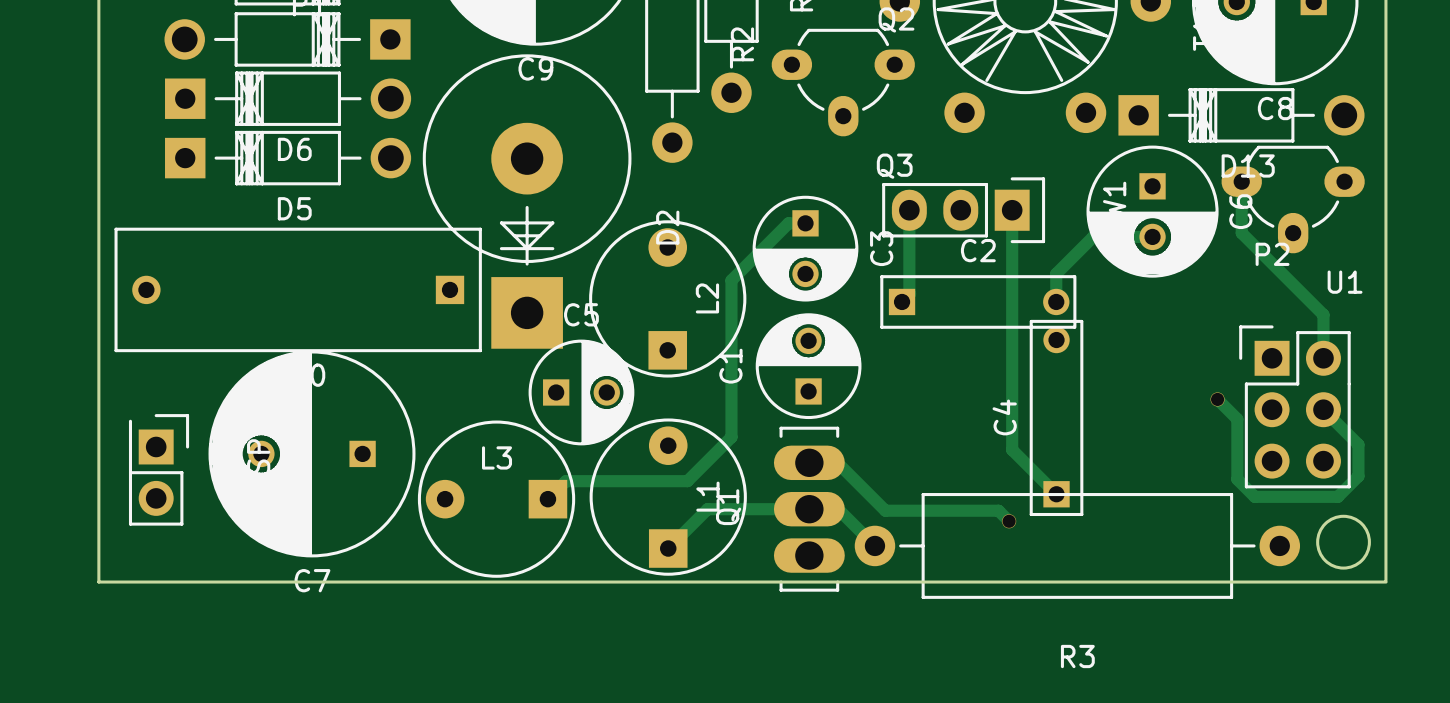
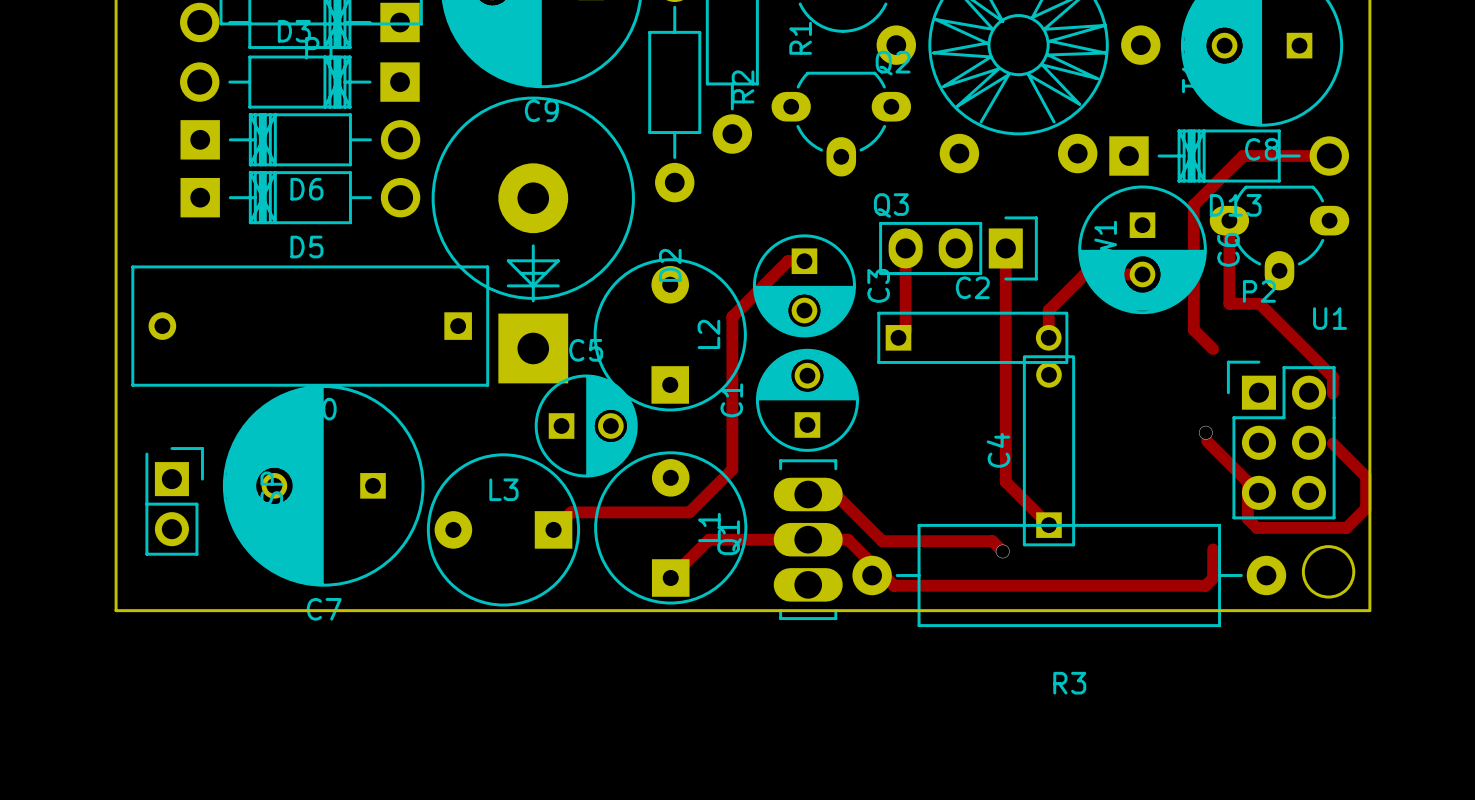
track: none -> (1329, 156) (1242, 156) (1193, 205) (1193, 329) (1213, 349)
track: (1241, 233) (1323, 314) (1323, 358) -> (1229, 270) (1229, 303) (1259, 303) (1332, 376) (1332, 393)
track: (1217, 399) (1237, 419) (1237, 479) (1254, 496) (1337, 496) (1358, 476) (1358, 444) (1323, 409) -> none
track: none -> (1207, 441) (1247, 482) (1247, 518) (1256, 527) (1346, 527) (1366, 508) (1366, 476) (1332, 443)
track: (838, 509) (874, 545) -> (836, 539) (848, 539) (894, 585) (1205, 585) (1213, 578) (1213, 549)

